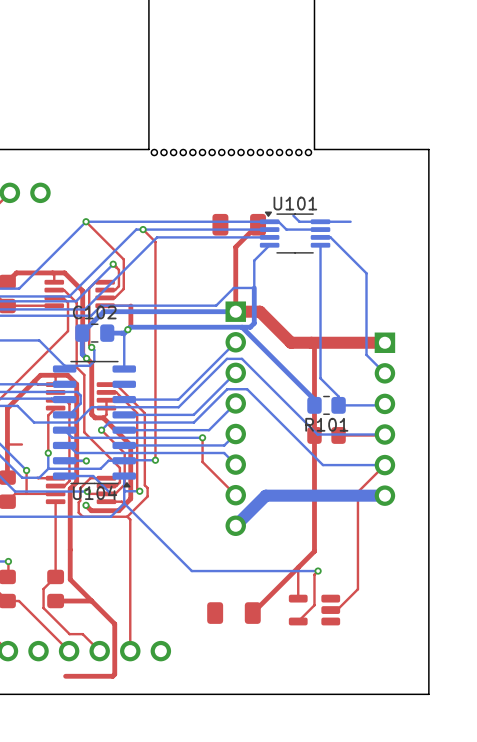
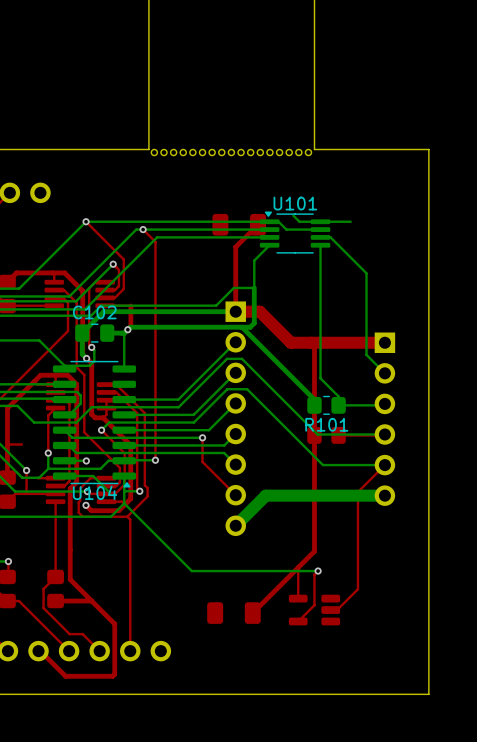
top track: none -> (38, 649) (65, 676)

